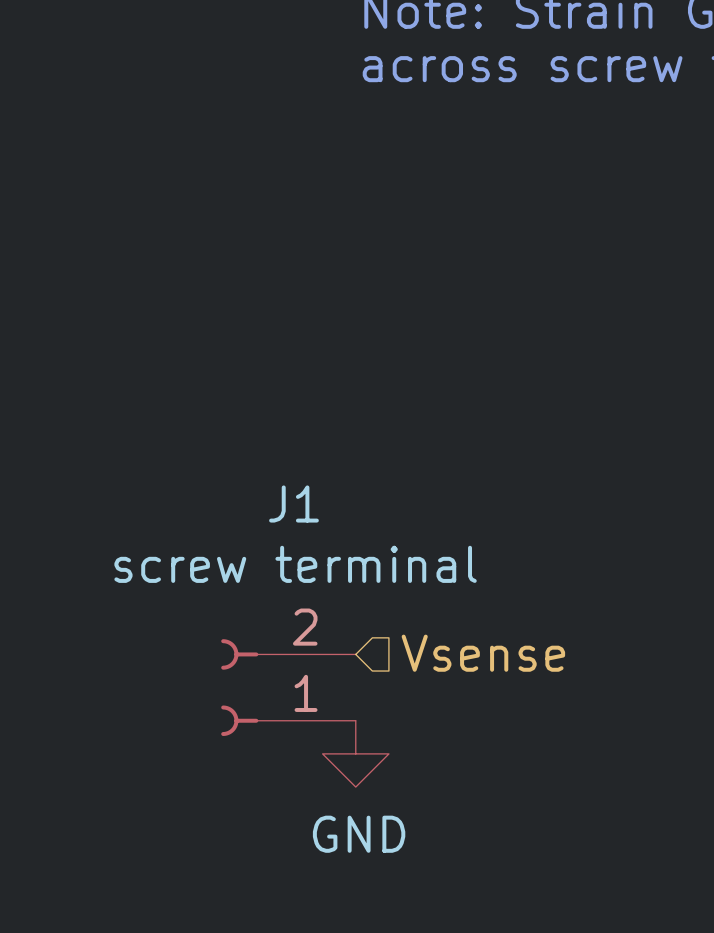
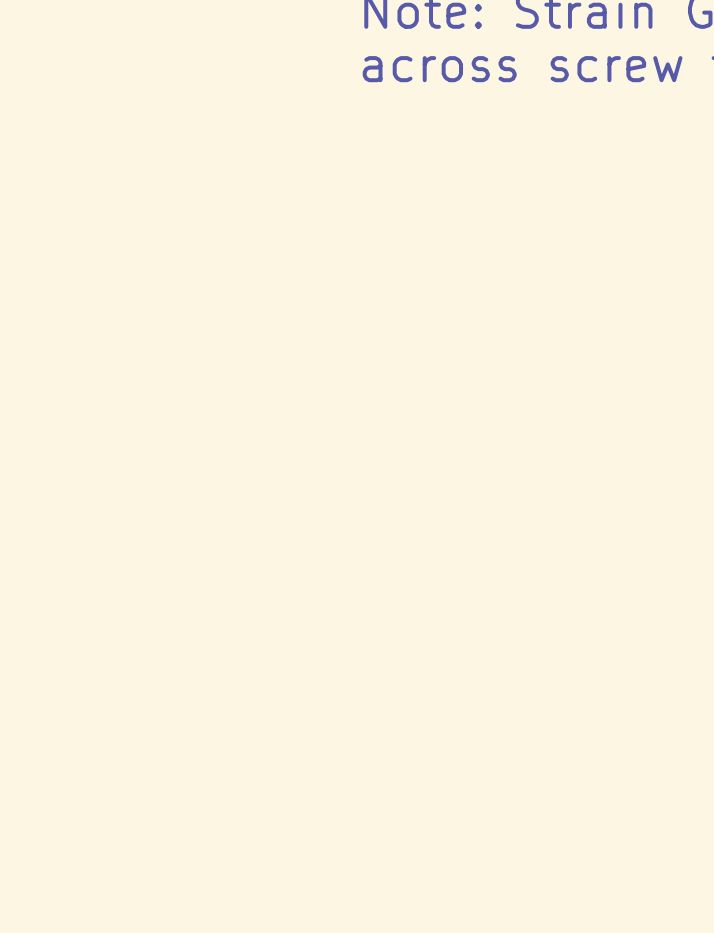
hierarchical label: Vsense (483, 653) -> none
J1: screw terminal (288, 687) -> none
power symbol: GND (355, 753) -> none

